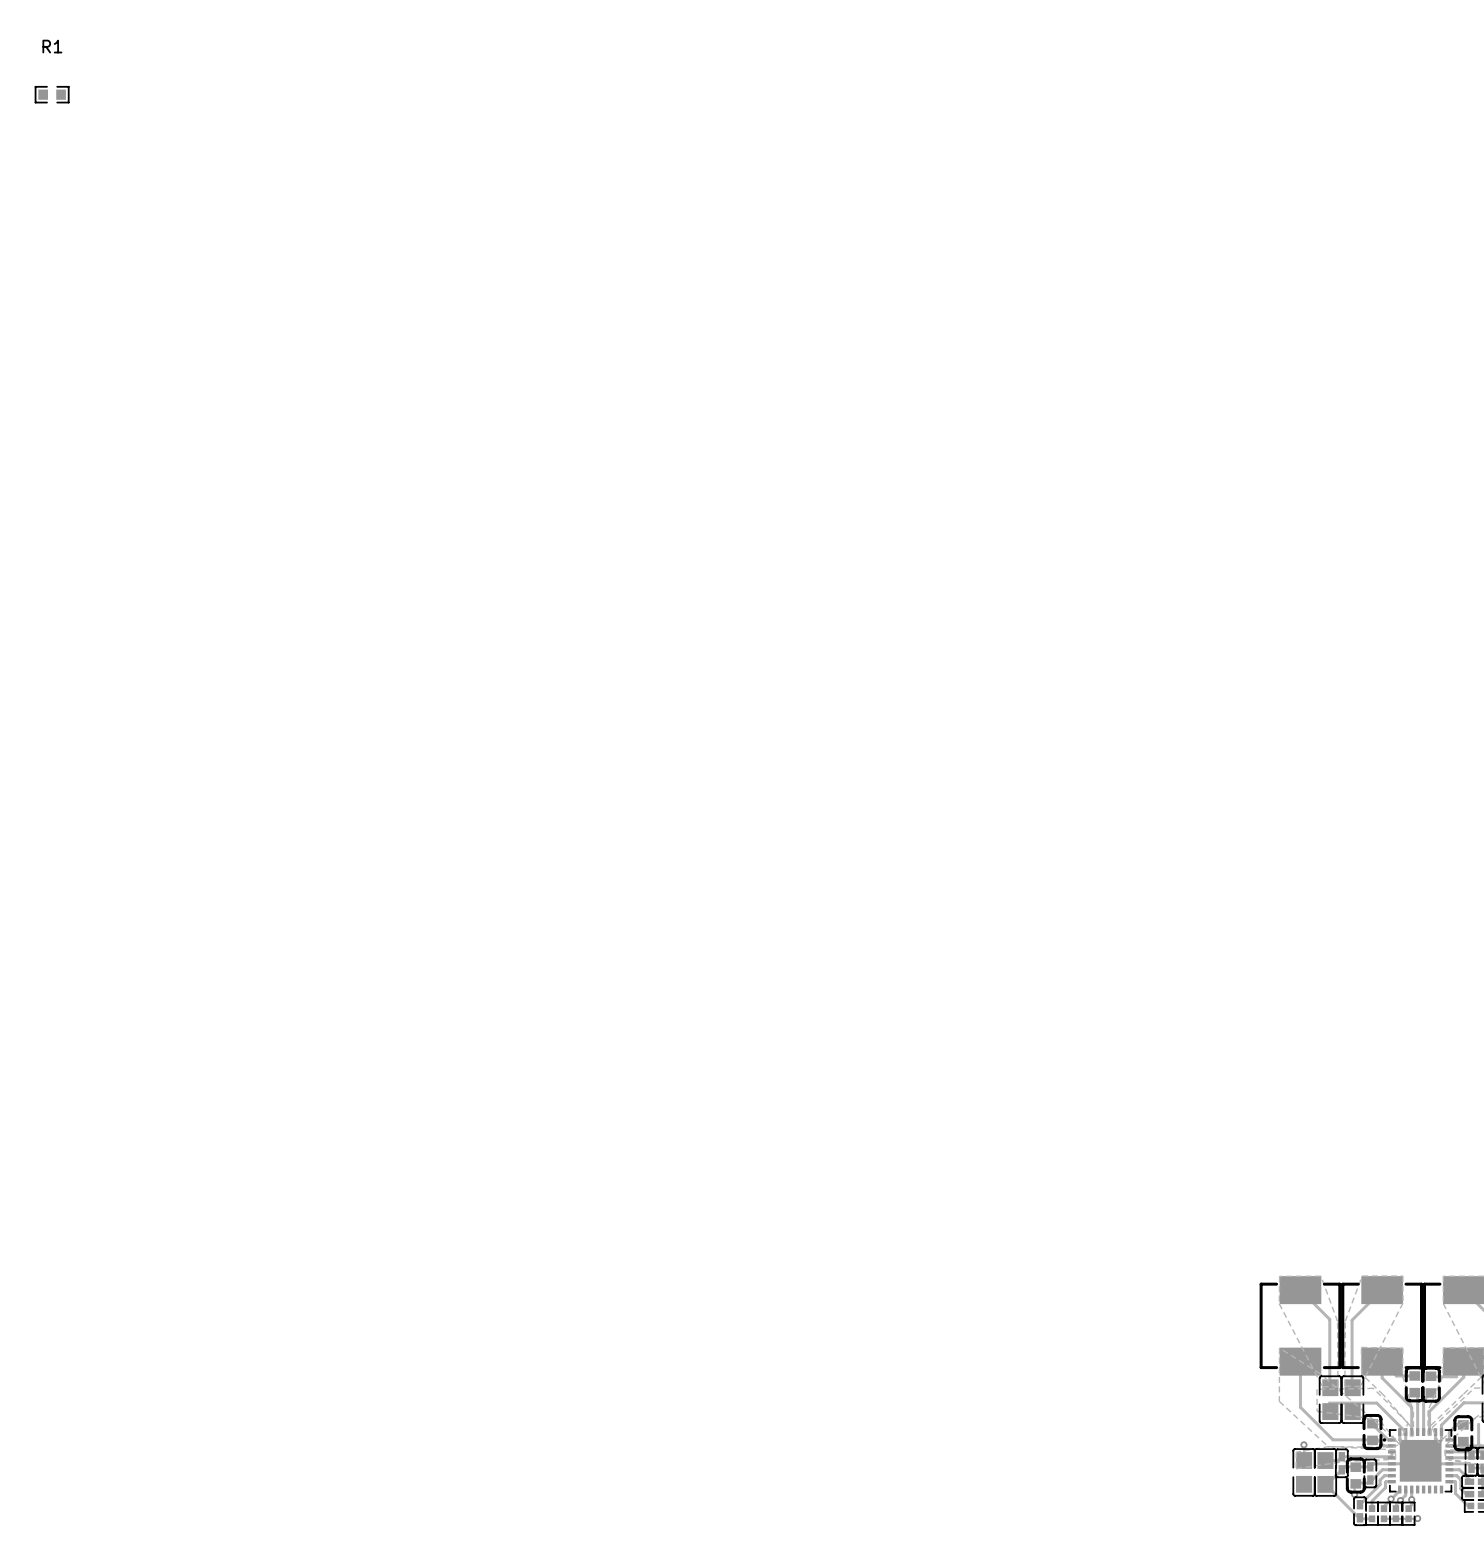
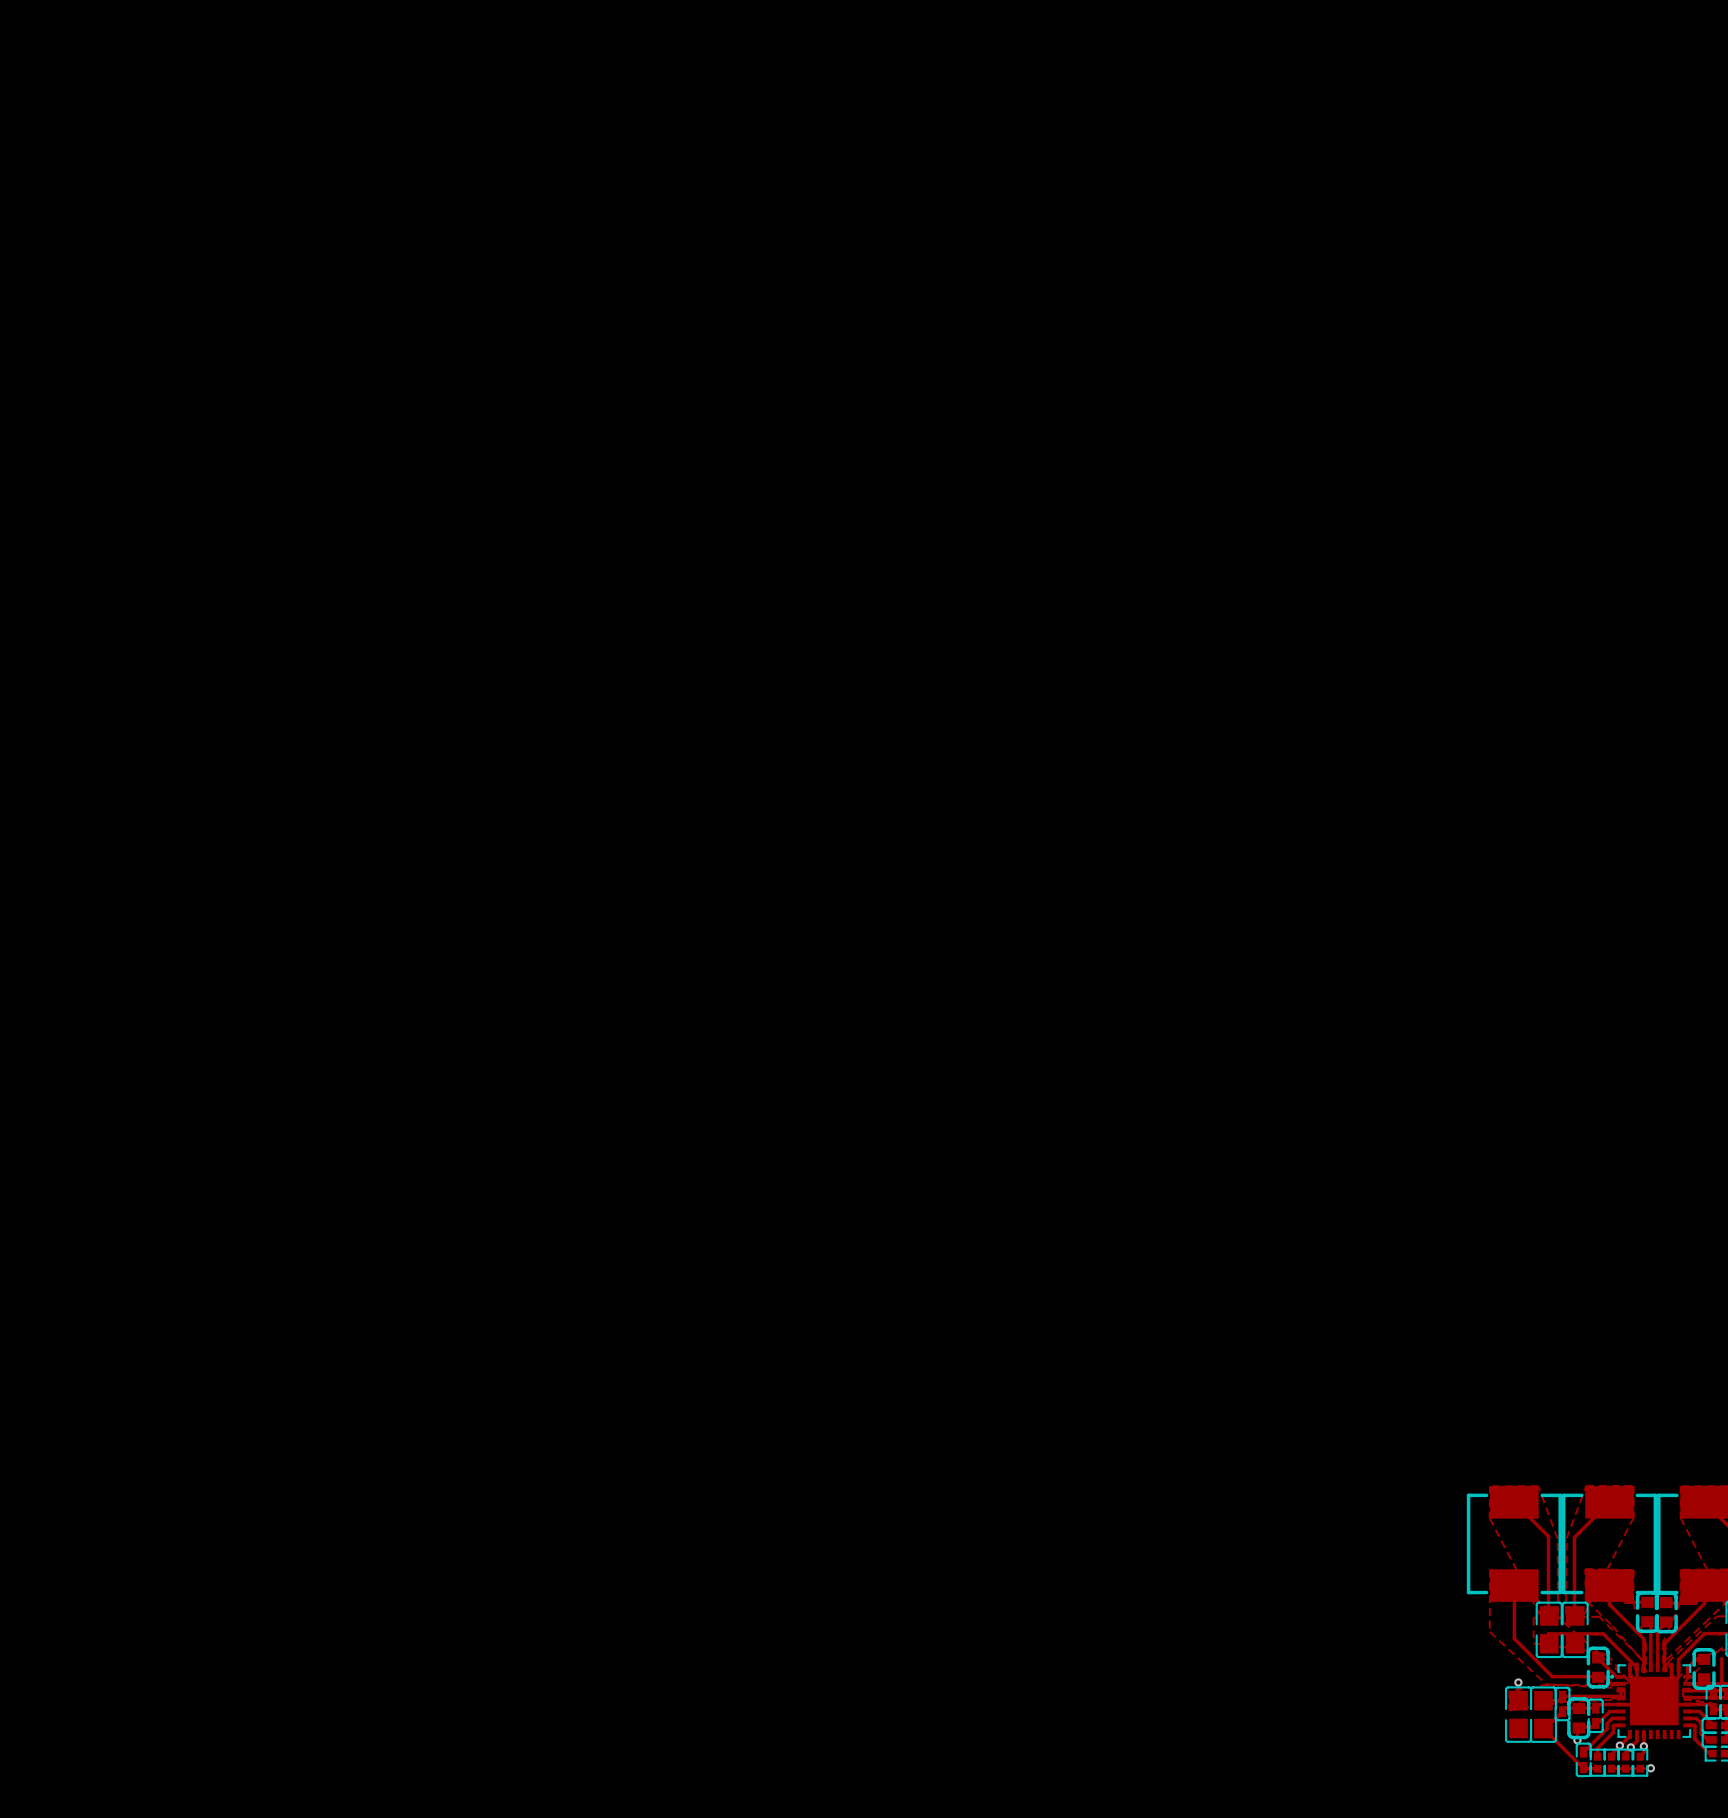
R1: (52, 94) -> none

